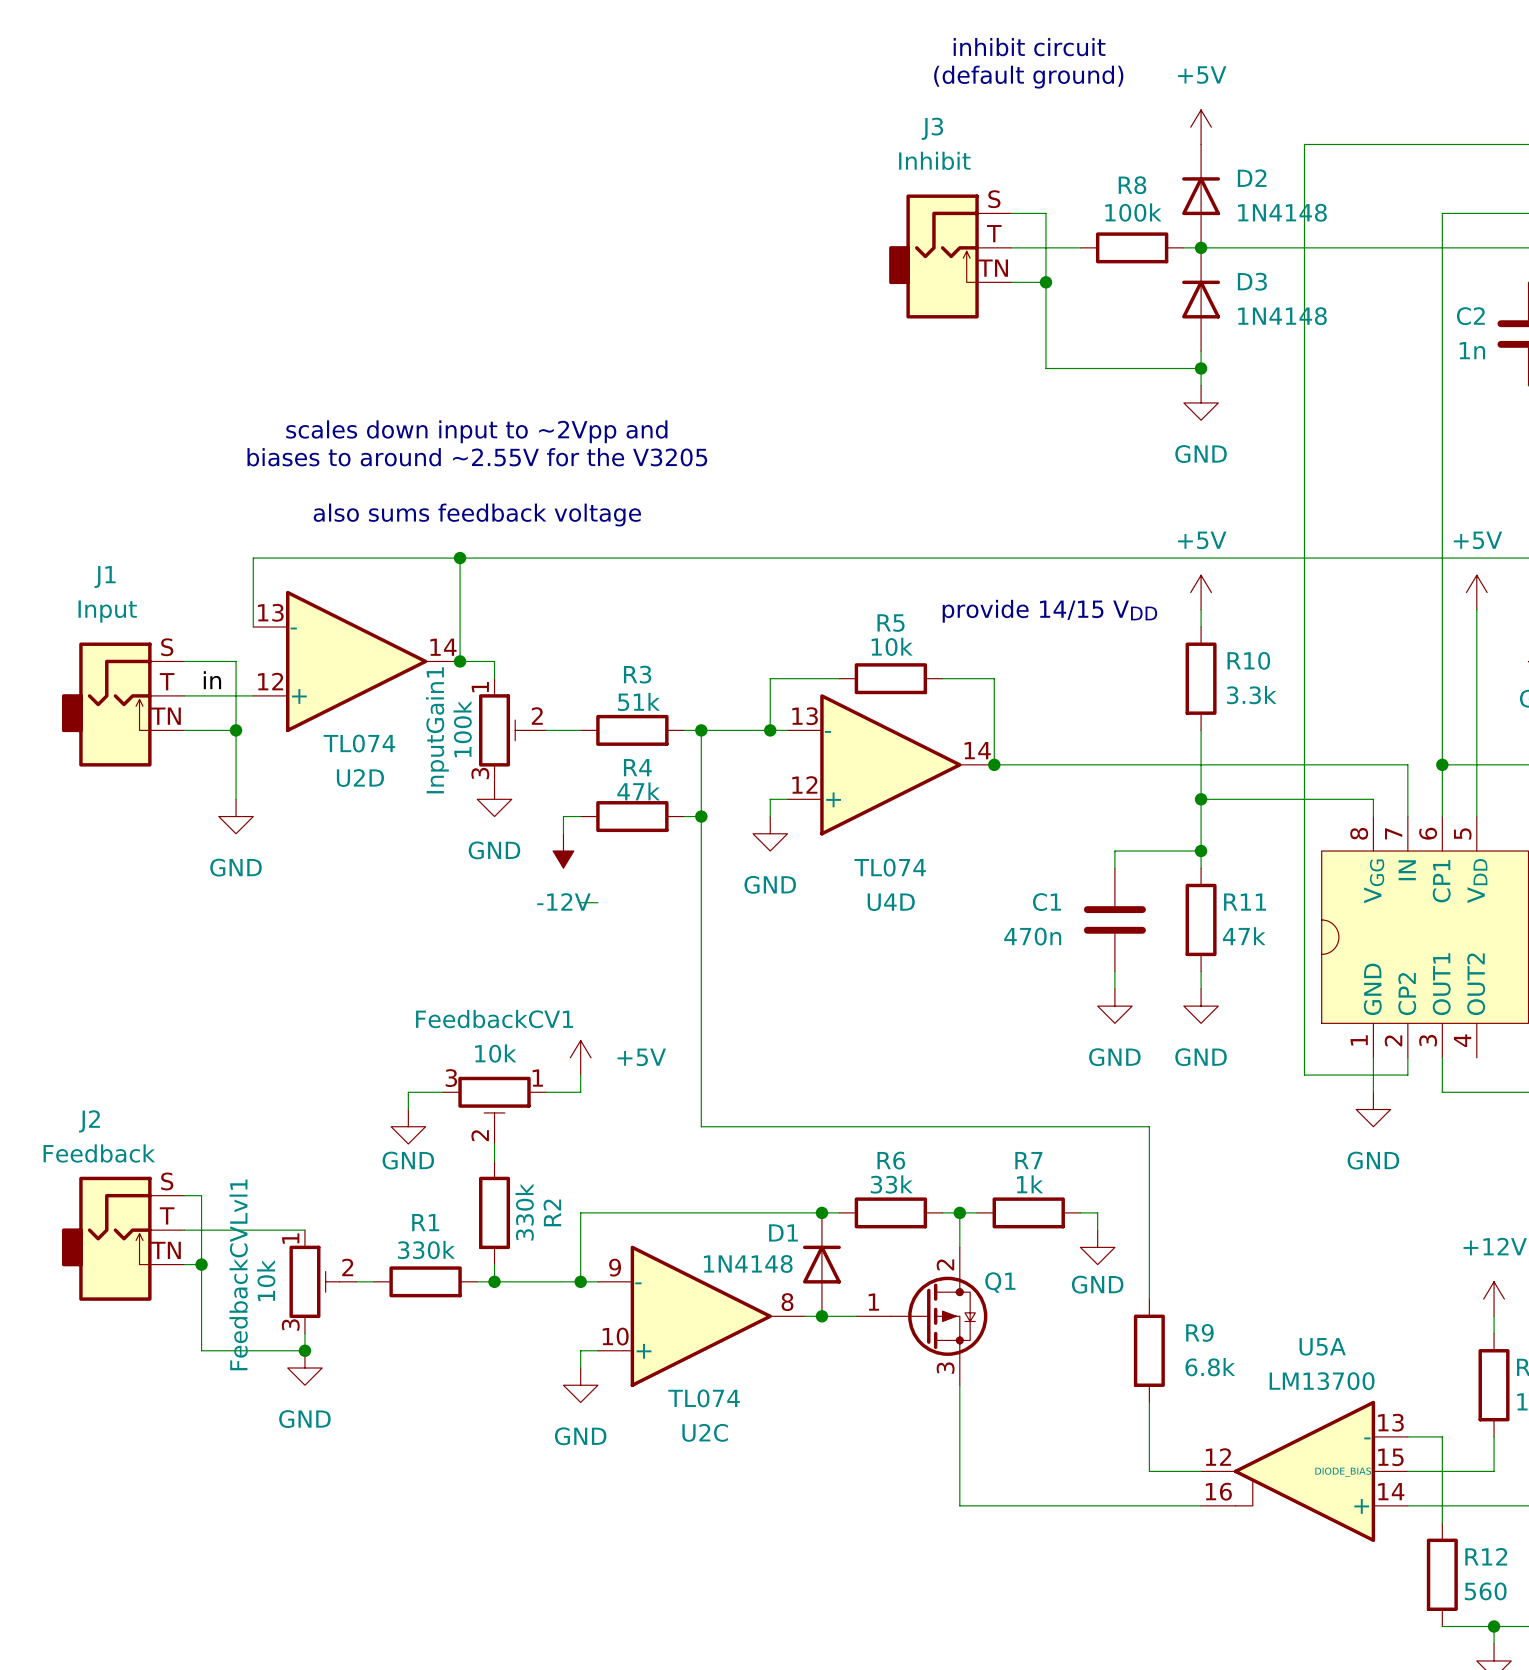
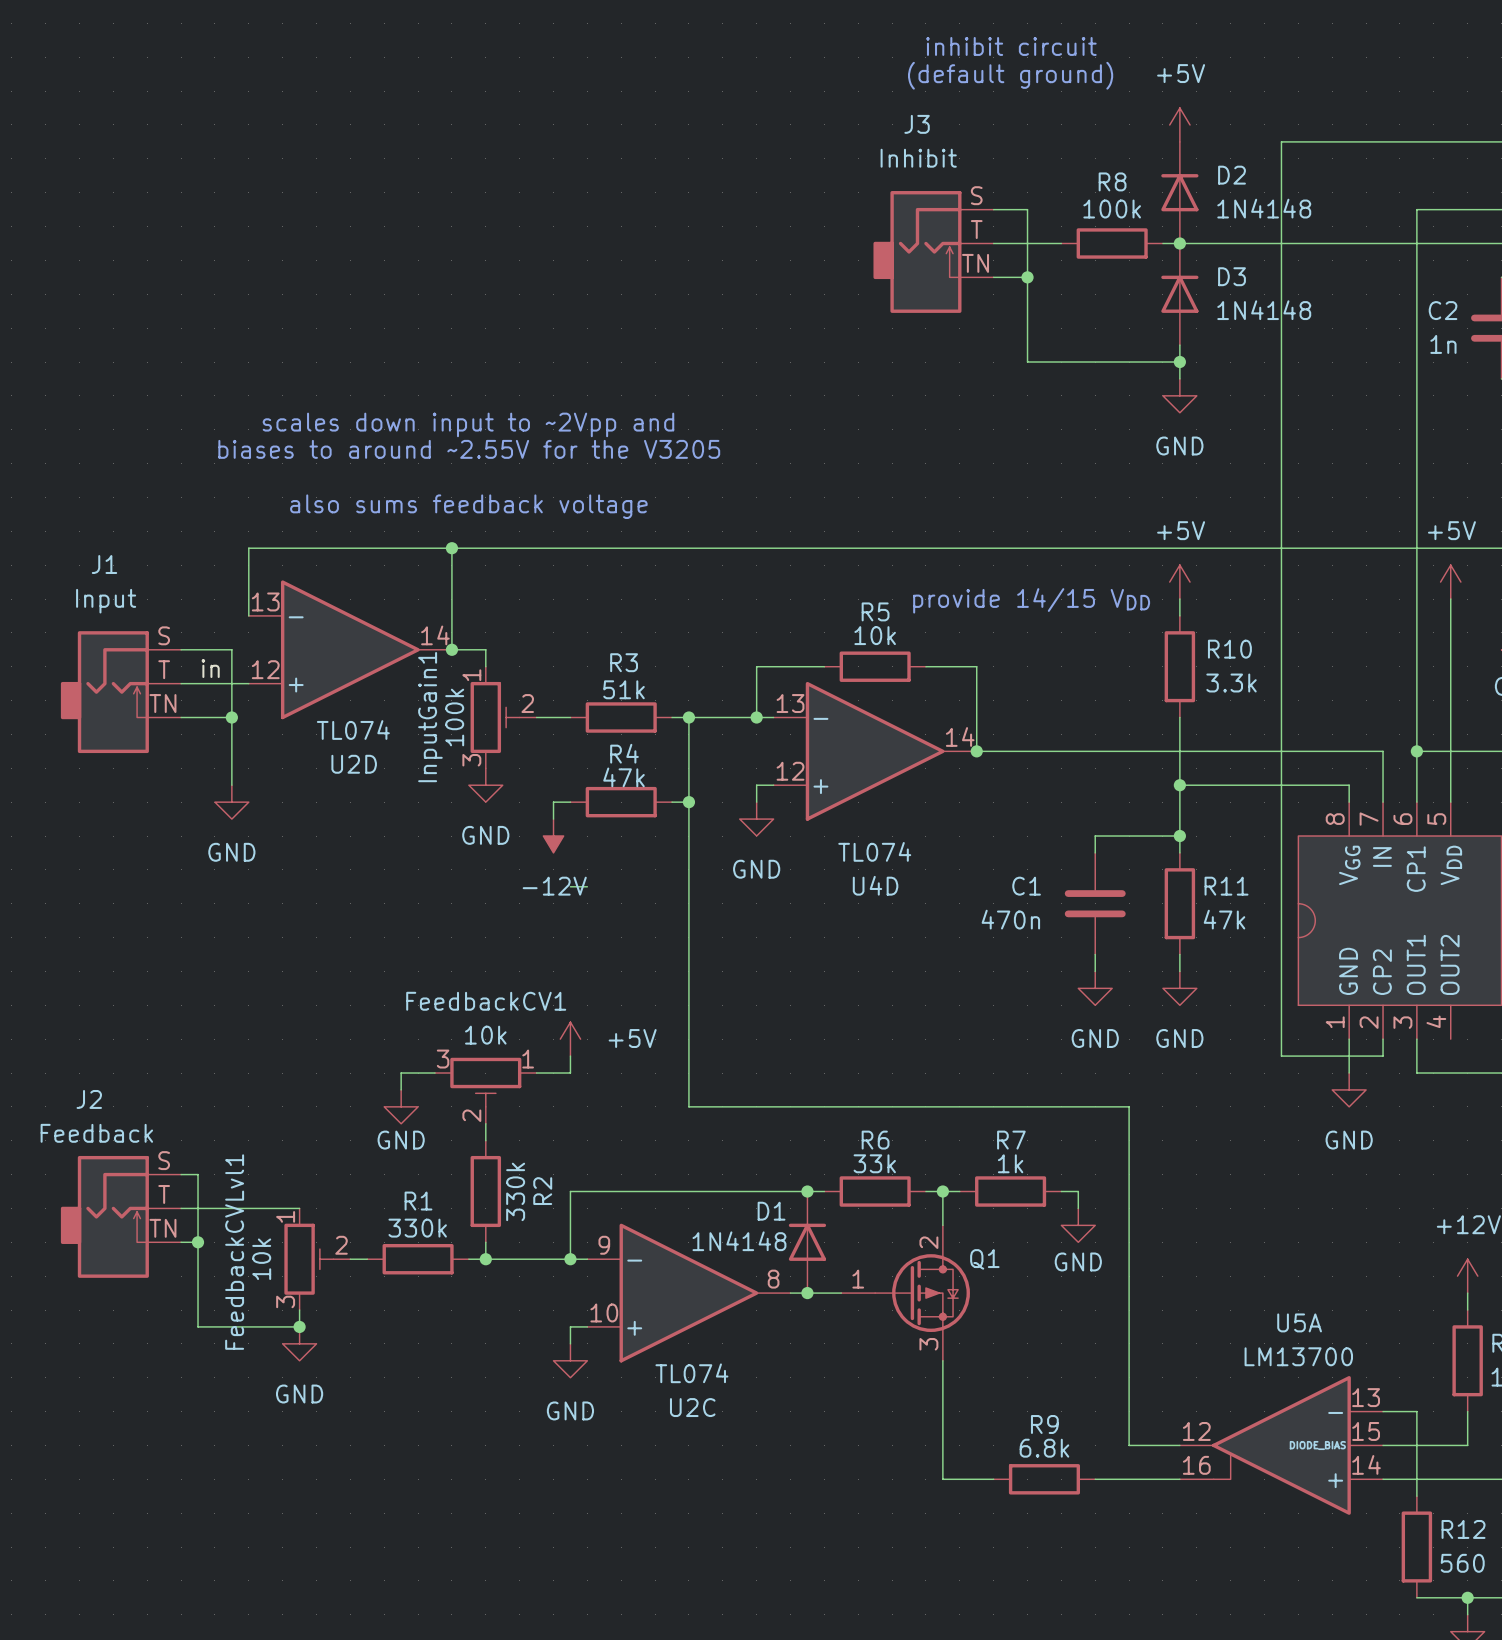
wire: none -> (1129, 1276) (1129, 1377)
R9 name position: R9 (1199, 1332) -> R9 (1044, 1424)
R9 rotation: 0° (1149, 1350) -> 90° clockwise (1044, 1479)
R9 position: (1149, 1350) -> (1044, 1479)
R9 value position: 6.8k (1210, 1367) -> 6.8k (1044, 1448)
wire: (1011, 1505) (1114, 1505) -> none

